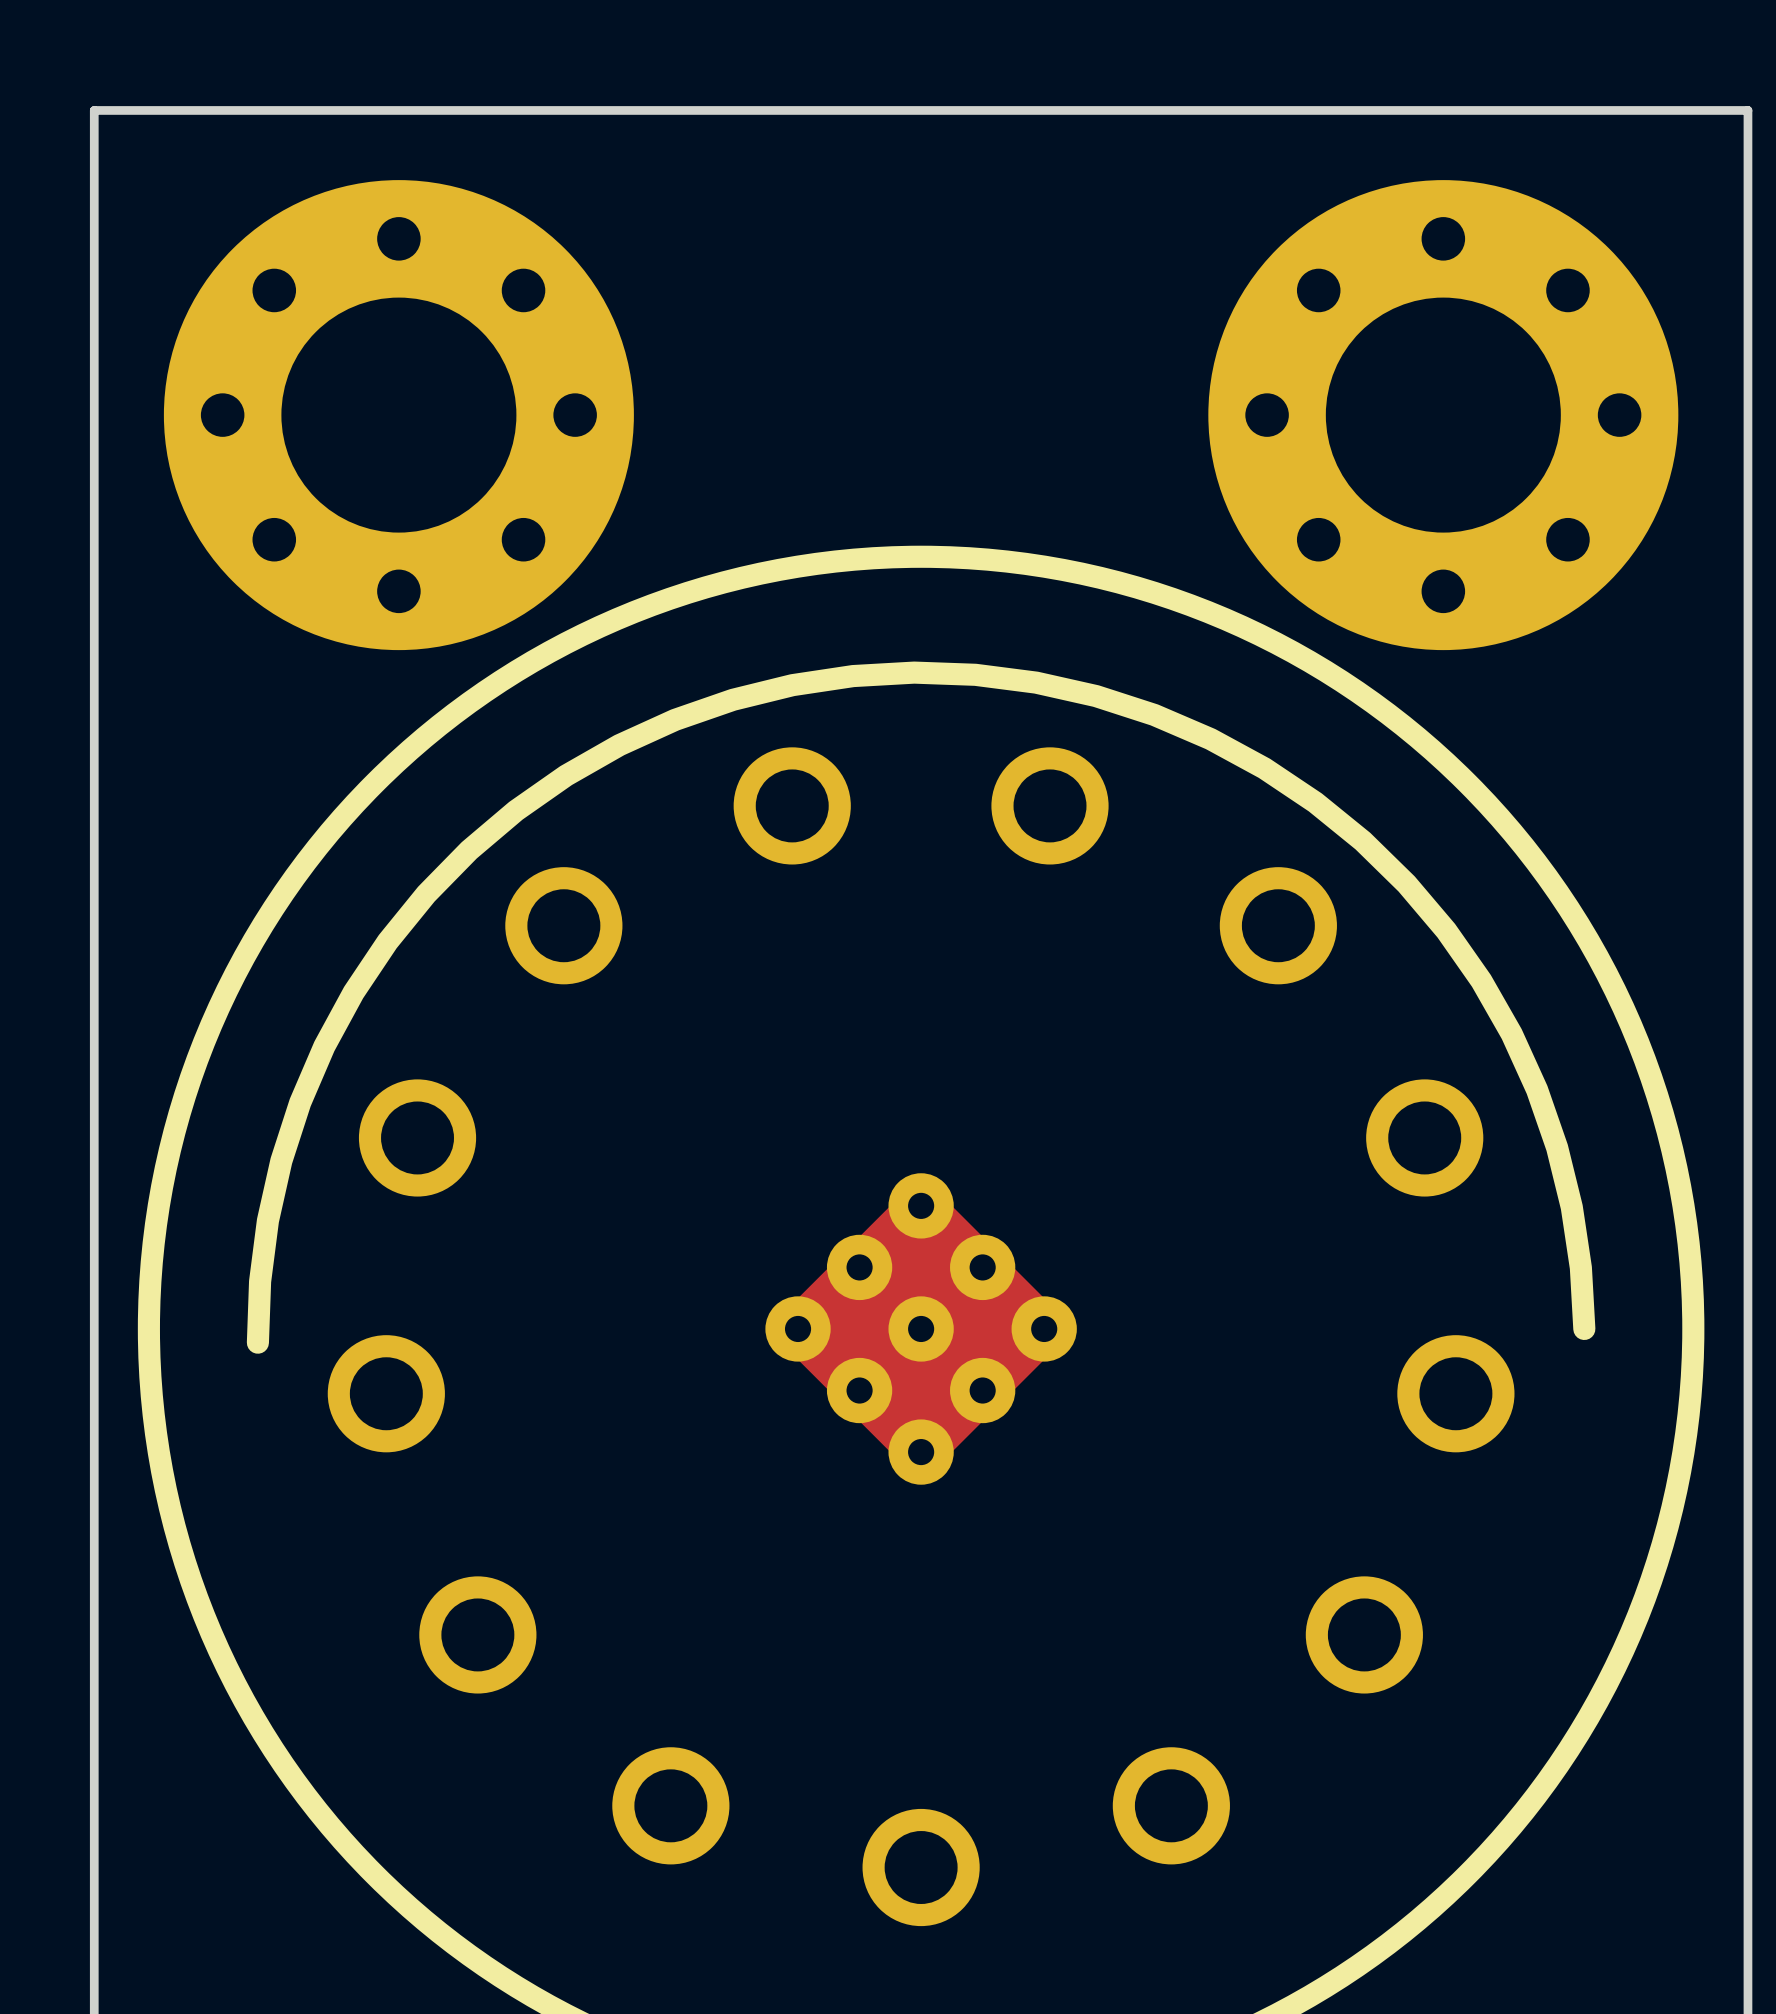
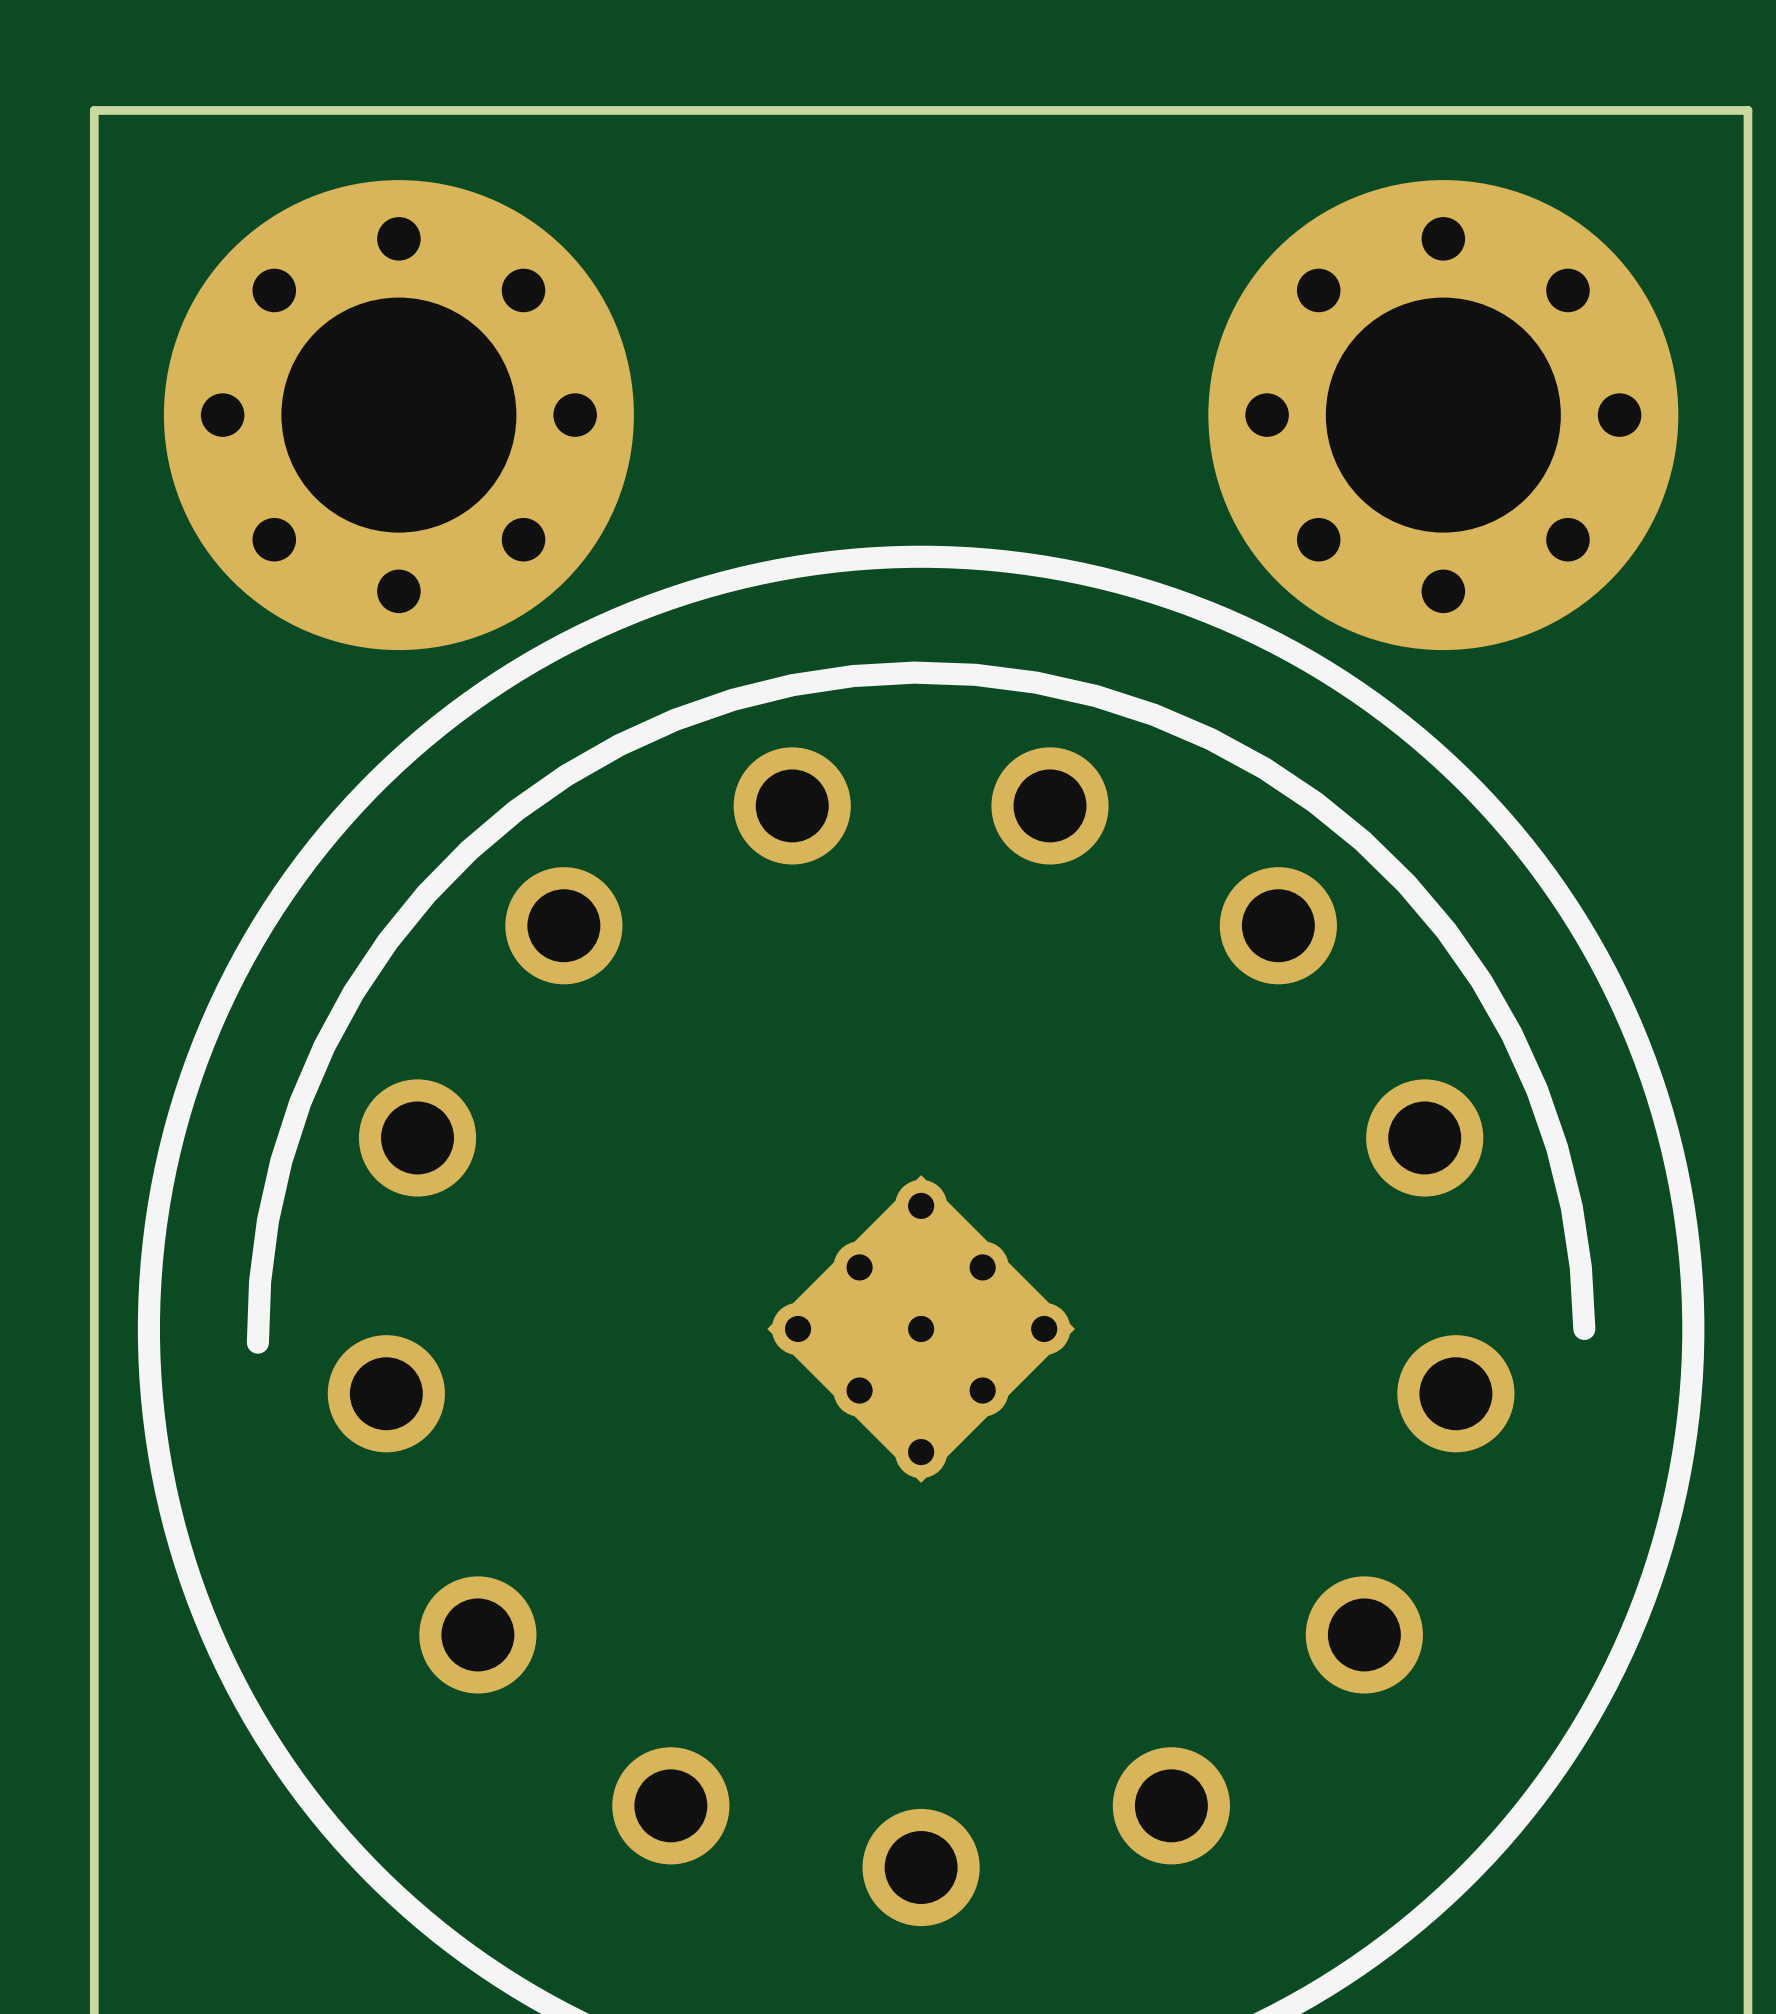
part footprint: [765, 1173, 1077, 1485] -> [767, 1175, 1075, 1483]

